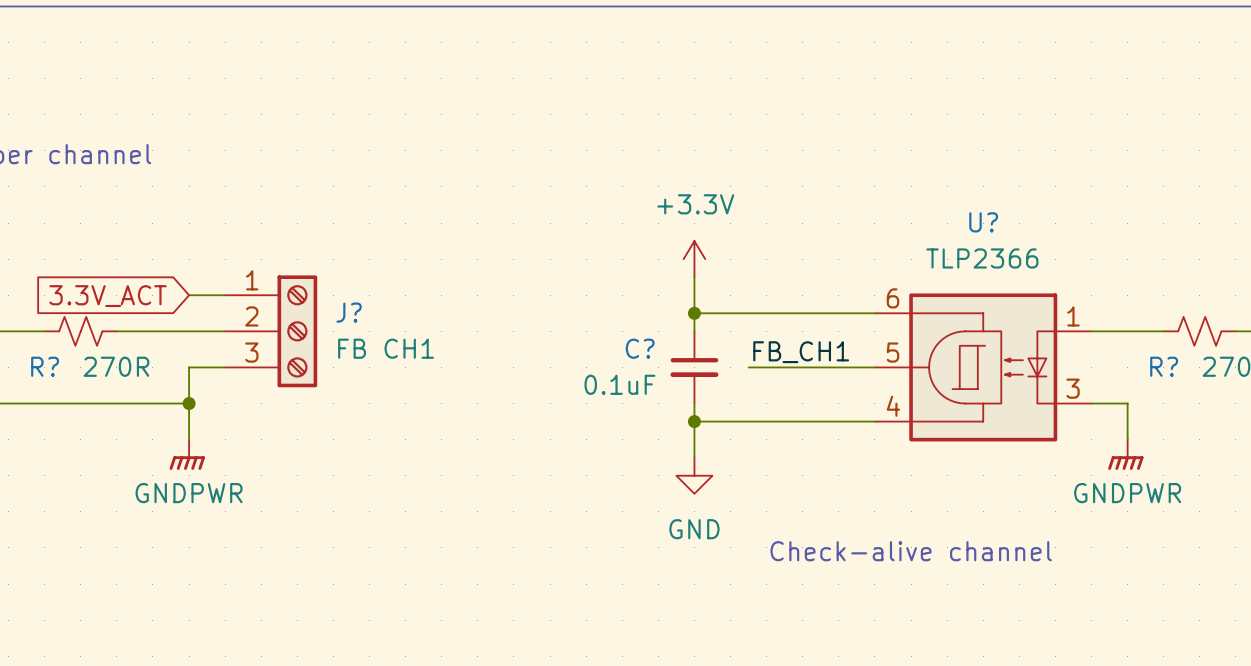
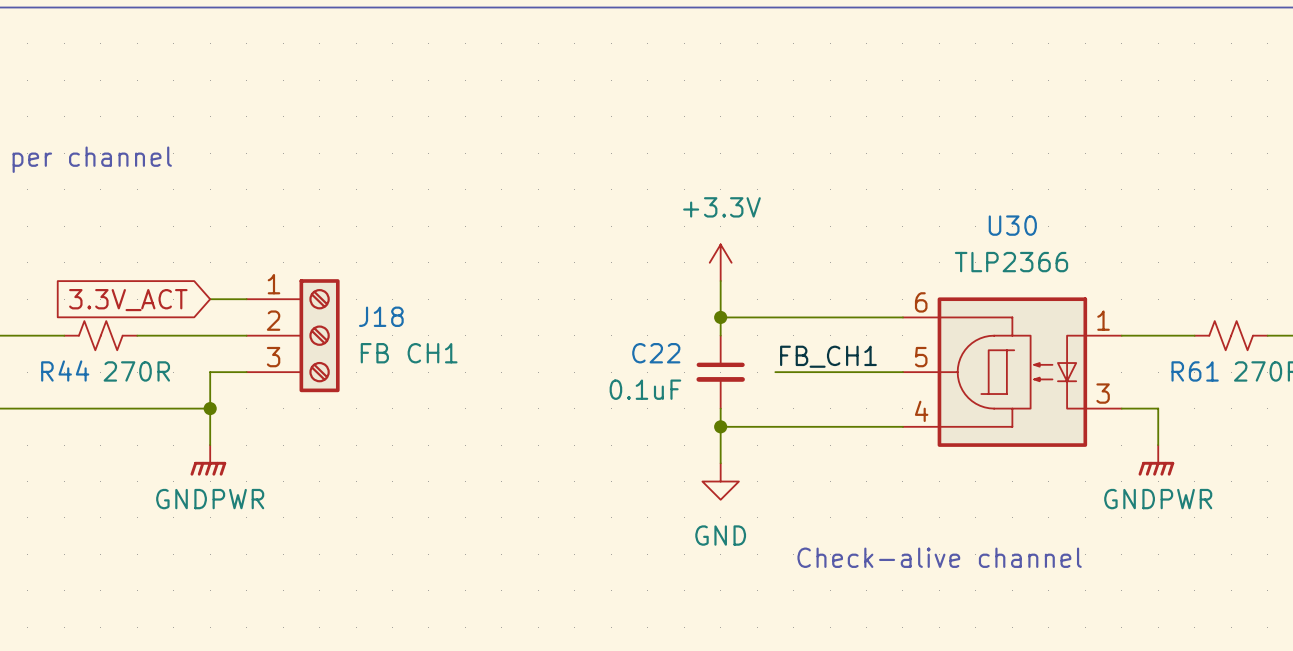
U? name: U? (983, 222) -> U30 (1012, 225)
J? name: J? (349, 312) -> J18 (381, 316)
C? name: C? (640, 348) -> C22 (656, 353)
R? name: R? (45, 366) -> R44 (65, 371)
R? name: R? (1164, 366) -> R61 (1195, 371)

